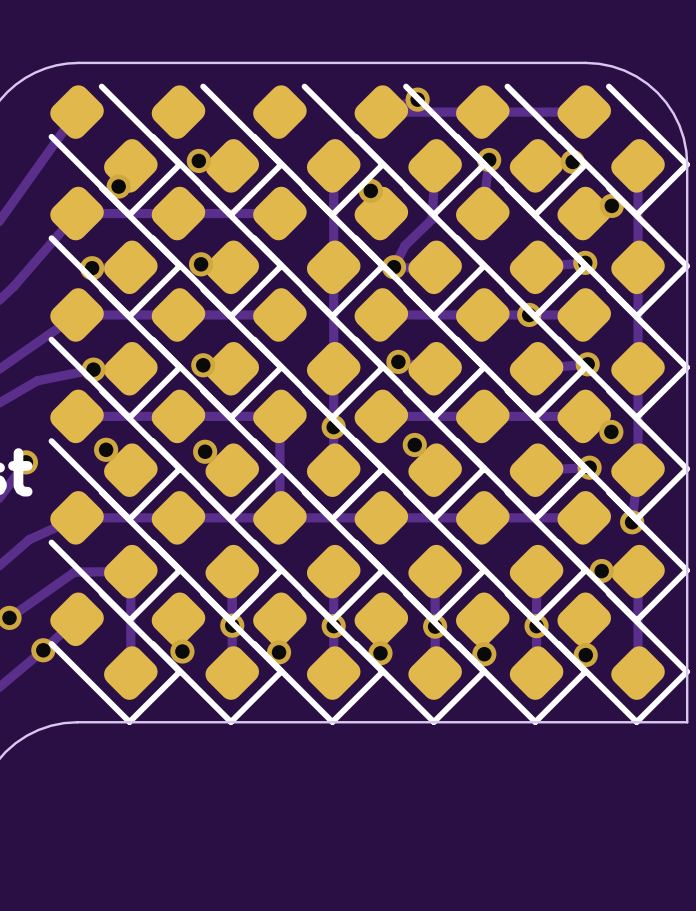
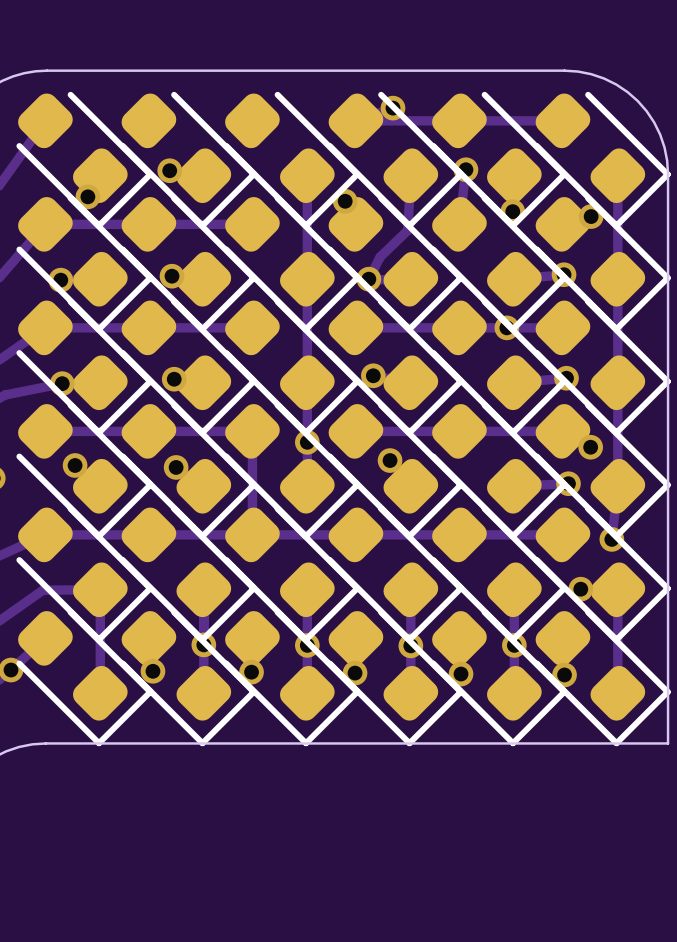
via position: (572, 161) -> (512, 211)

